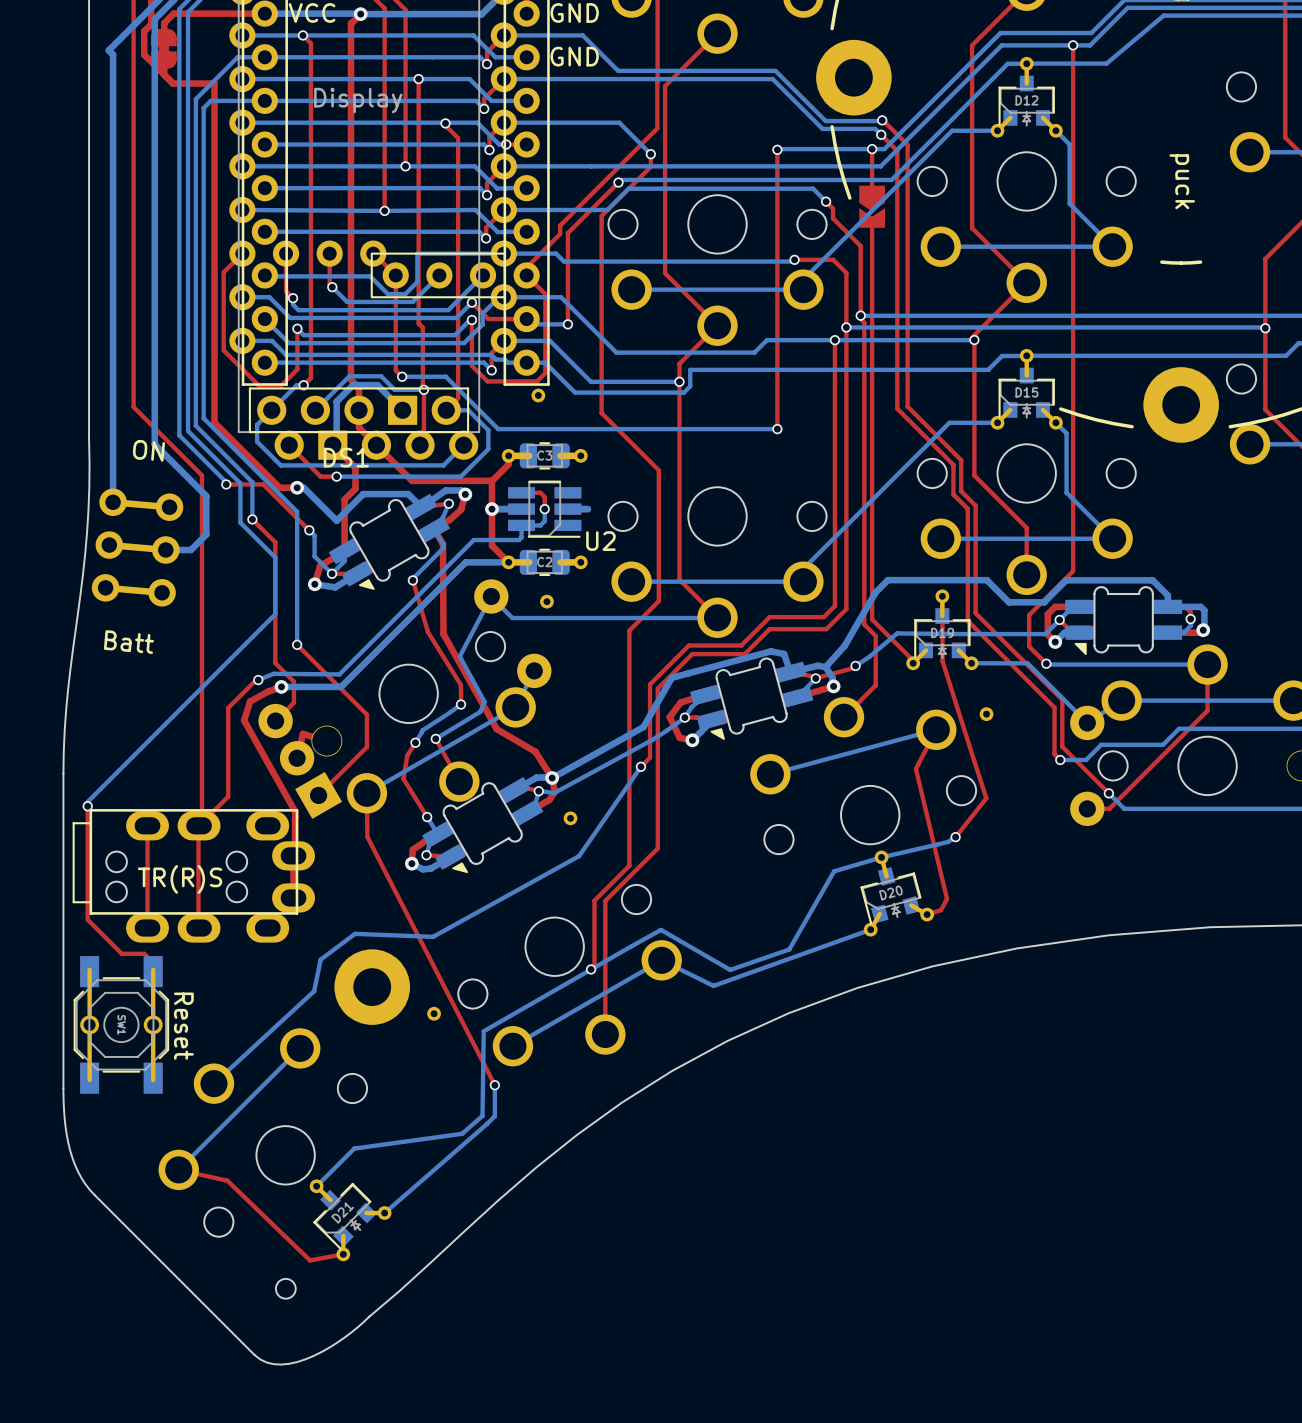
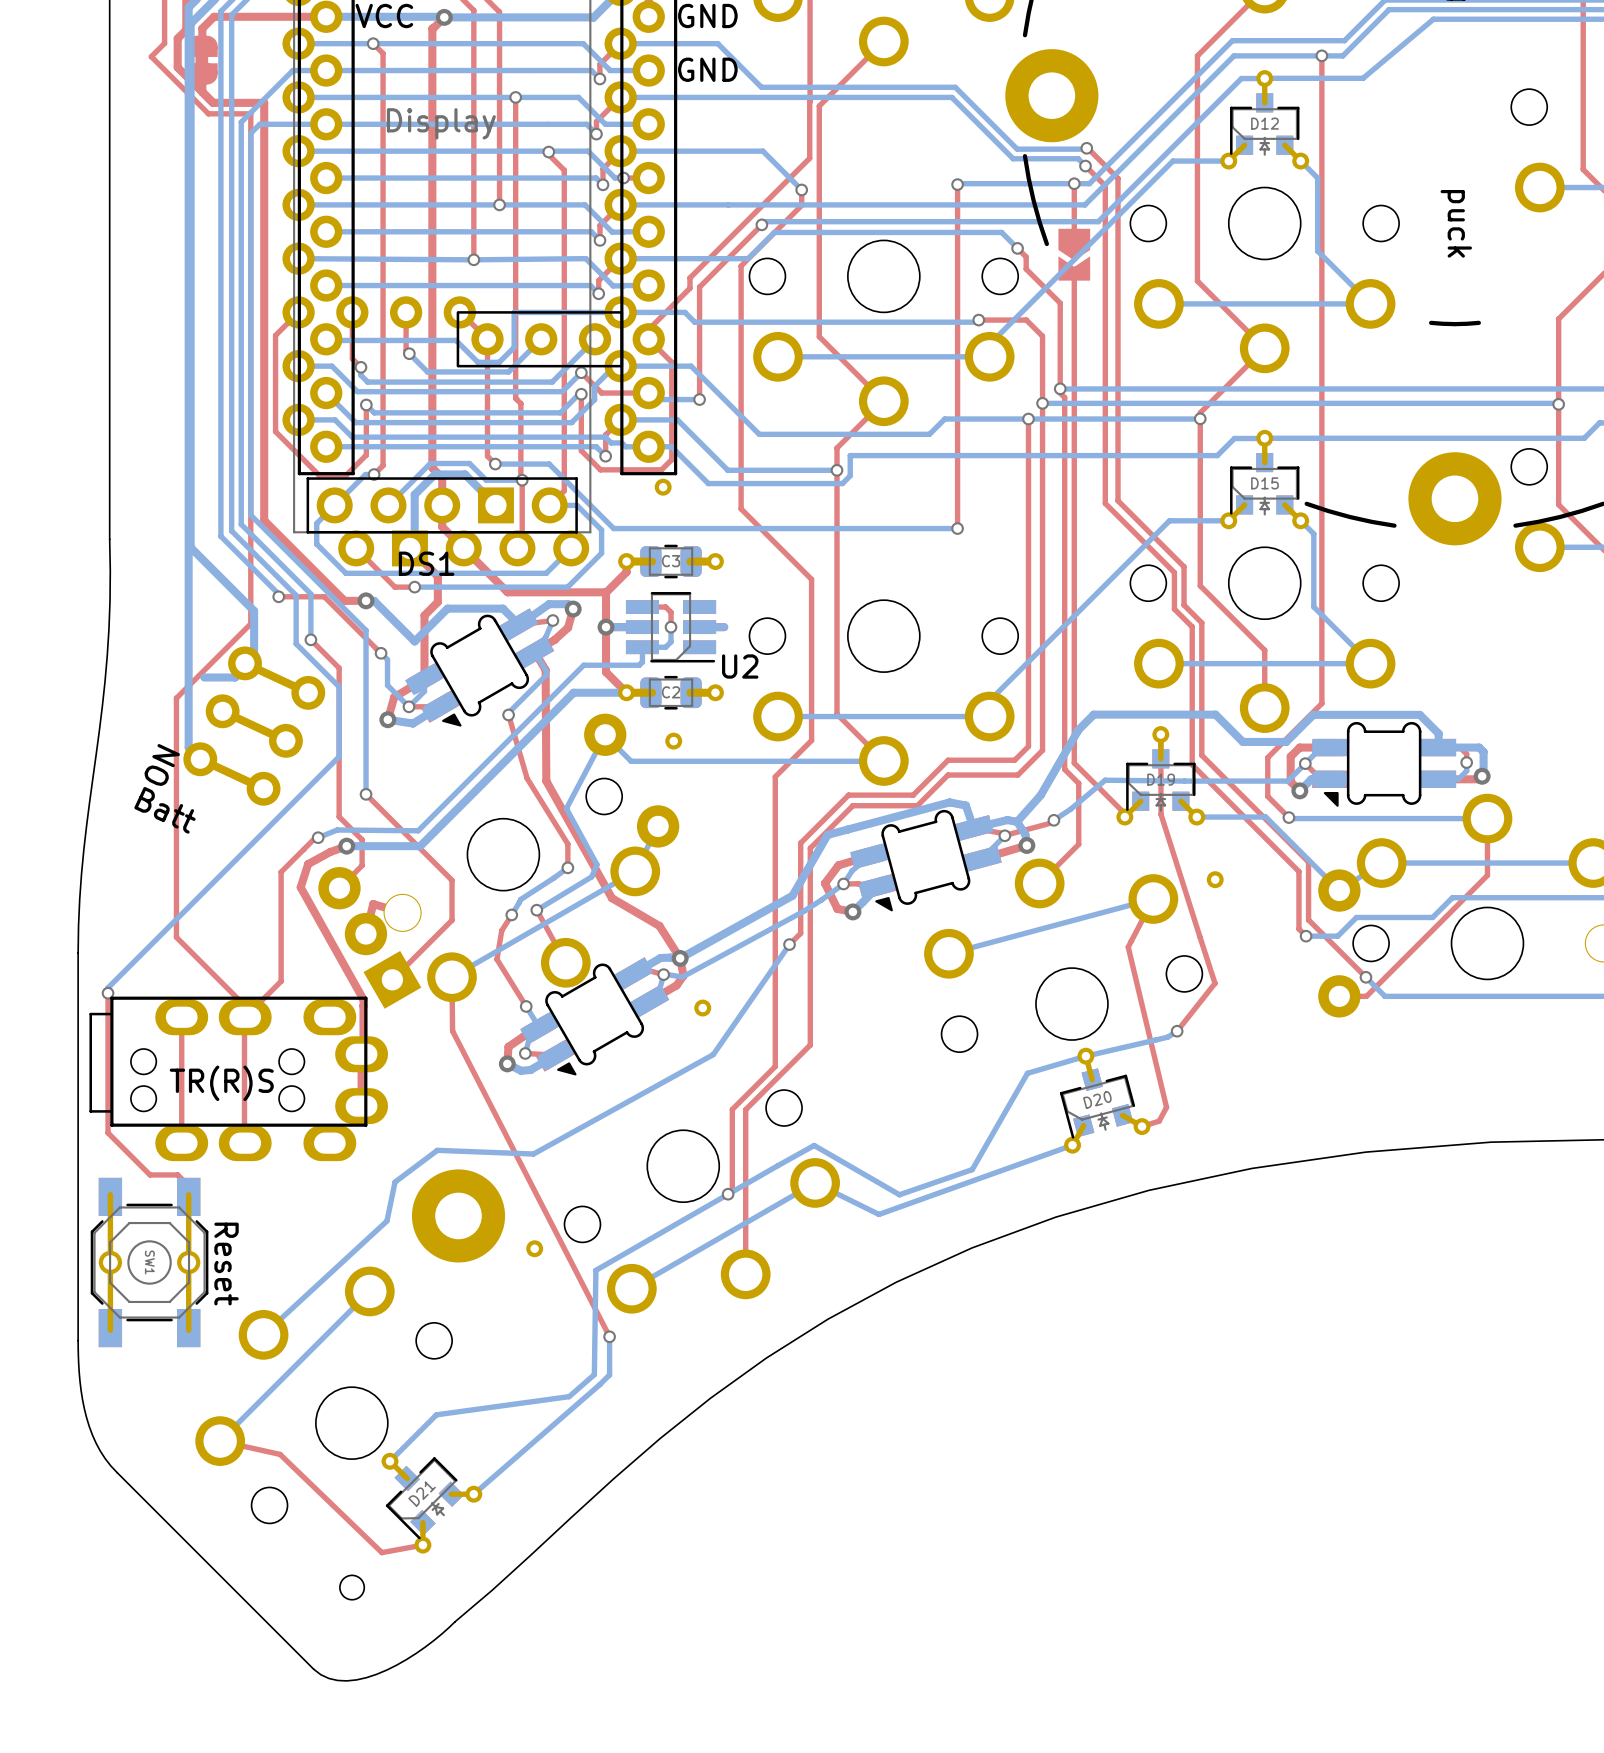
bottom track: (153, 6) (108, 50) (113, 54) (113, 502) -> (188, 7) (188, 747) (200, 759)
top track: (133, 35) (133, 407) (201, 475) (201, 819) -> (164, 43) (151, 56) (208, 113) (250, 113) (250, 623) (176, 698) (176, 937) (250, 1011)
part: (137, 547) -> none
part: none -> (254, 726)

